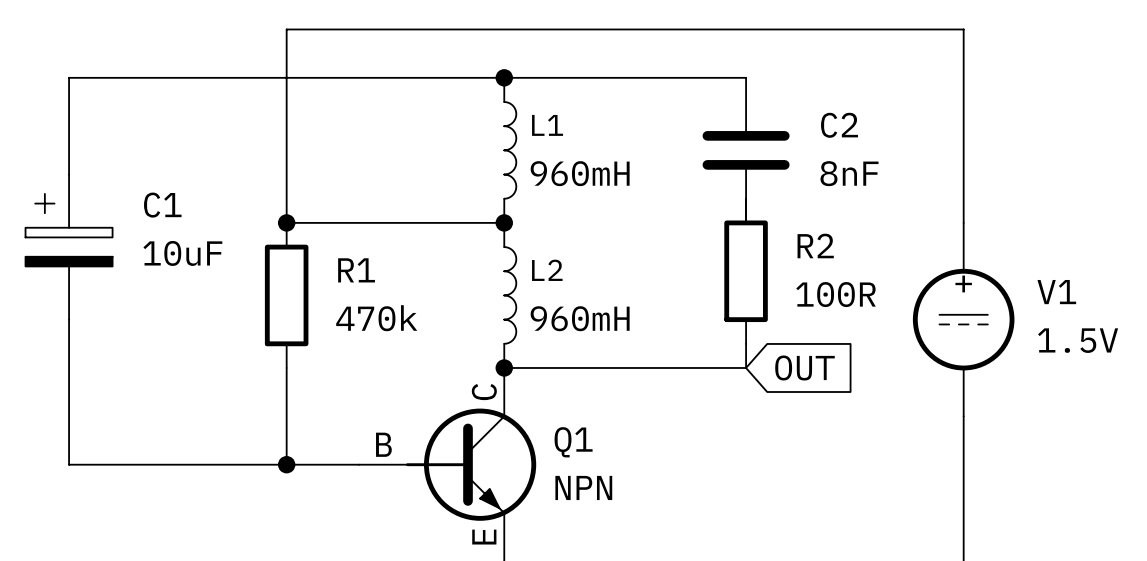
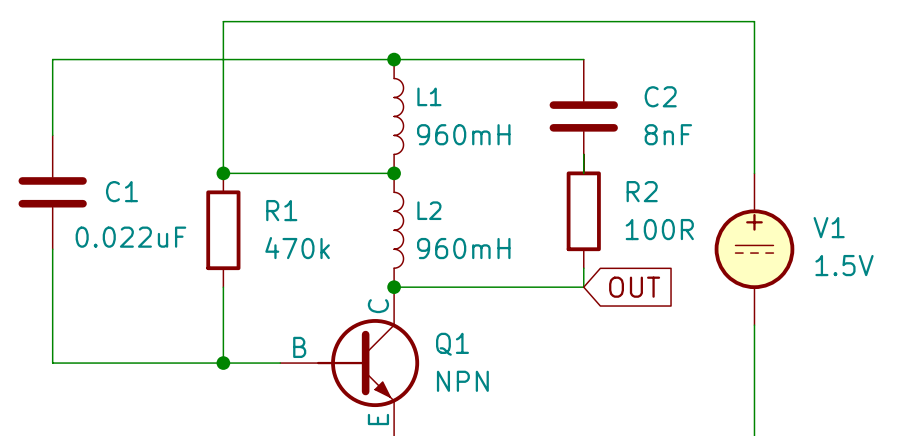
C1 symbol: [25, 174, 113, 320] -> [18, 135, 87, 250]
C1 name position: C1 (162, 205) -> C1 (122, 191)
C1 value: 10uF (182, 253) -> 0.022uF (130, 237)

